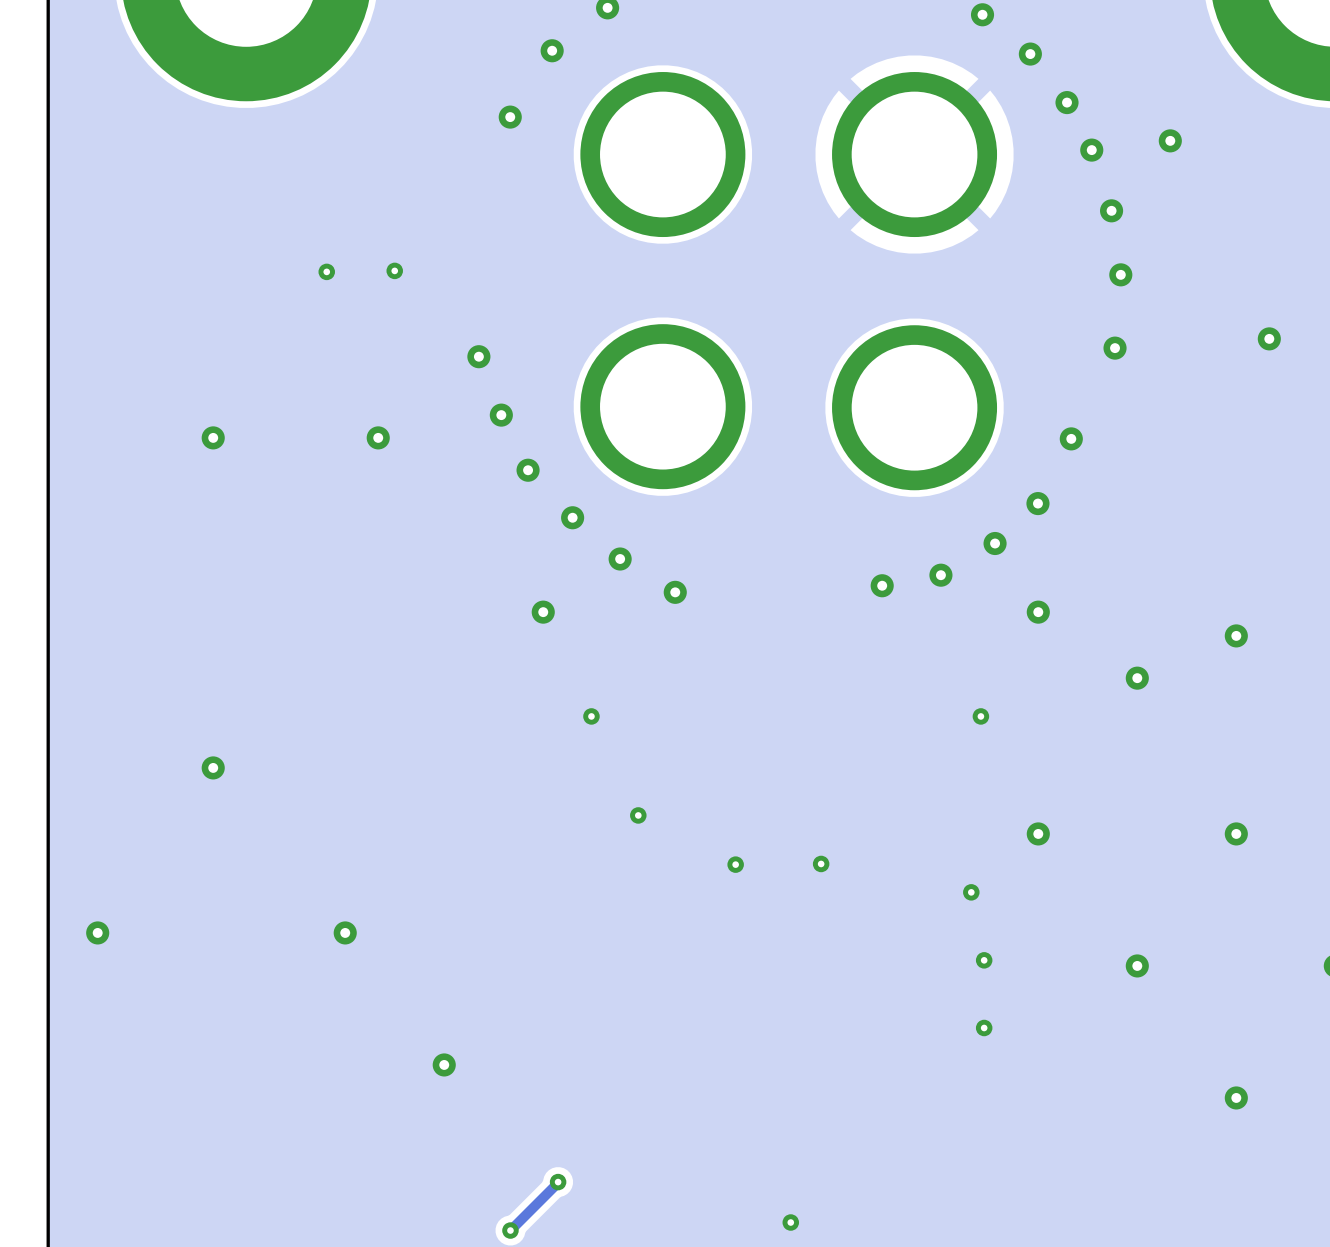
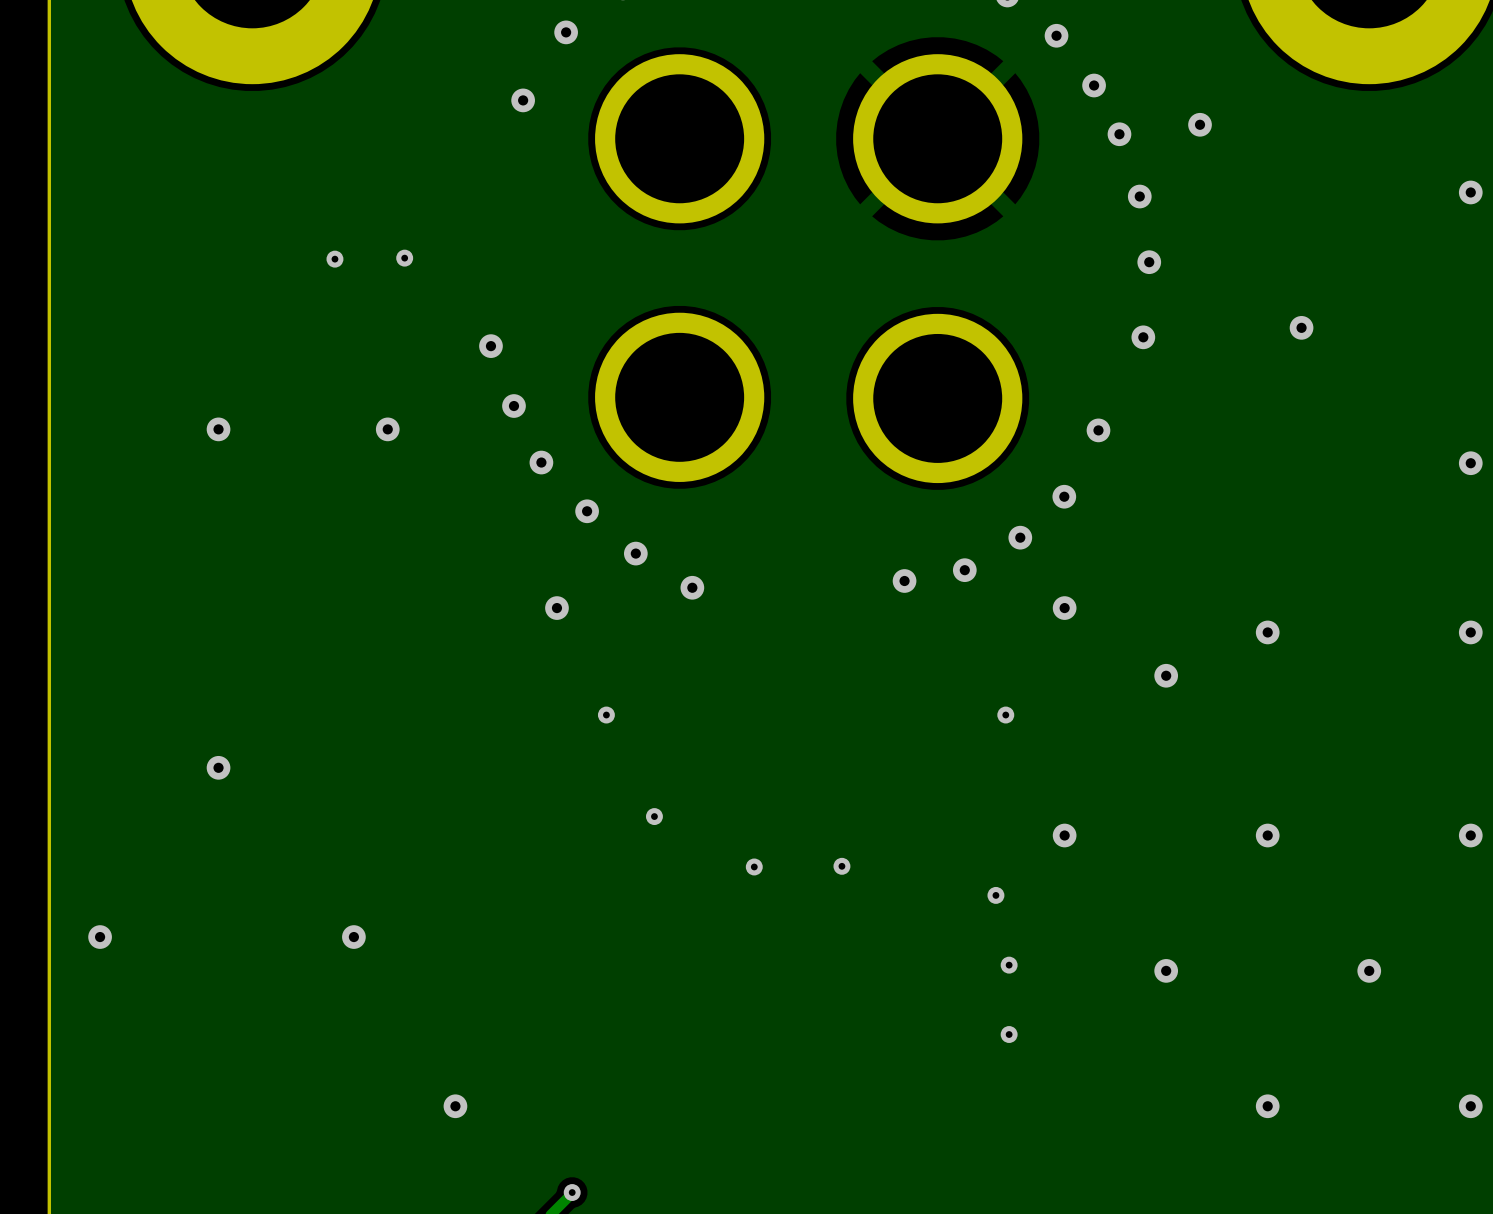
via position: (444, 1064) -> (455, 1106)

